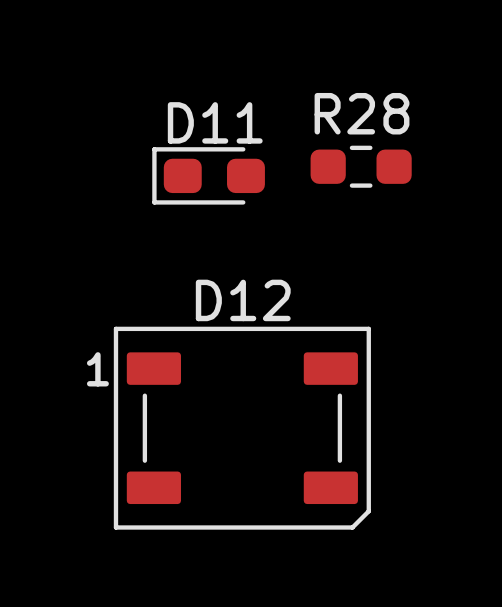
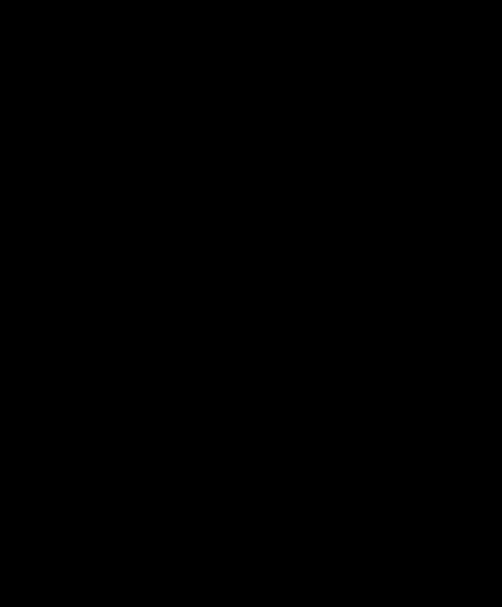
R28: (361, 166) -> none
D11: (208, 175) -> none
D12: (242, 428) -> none

